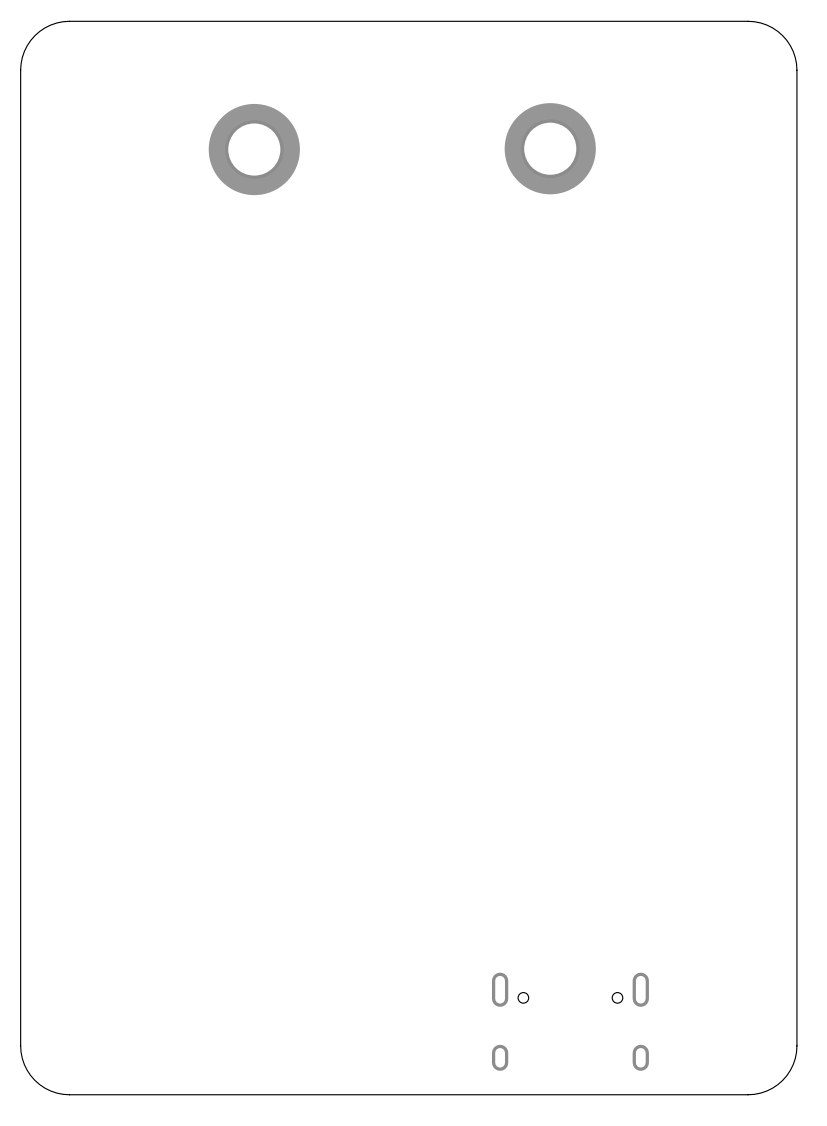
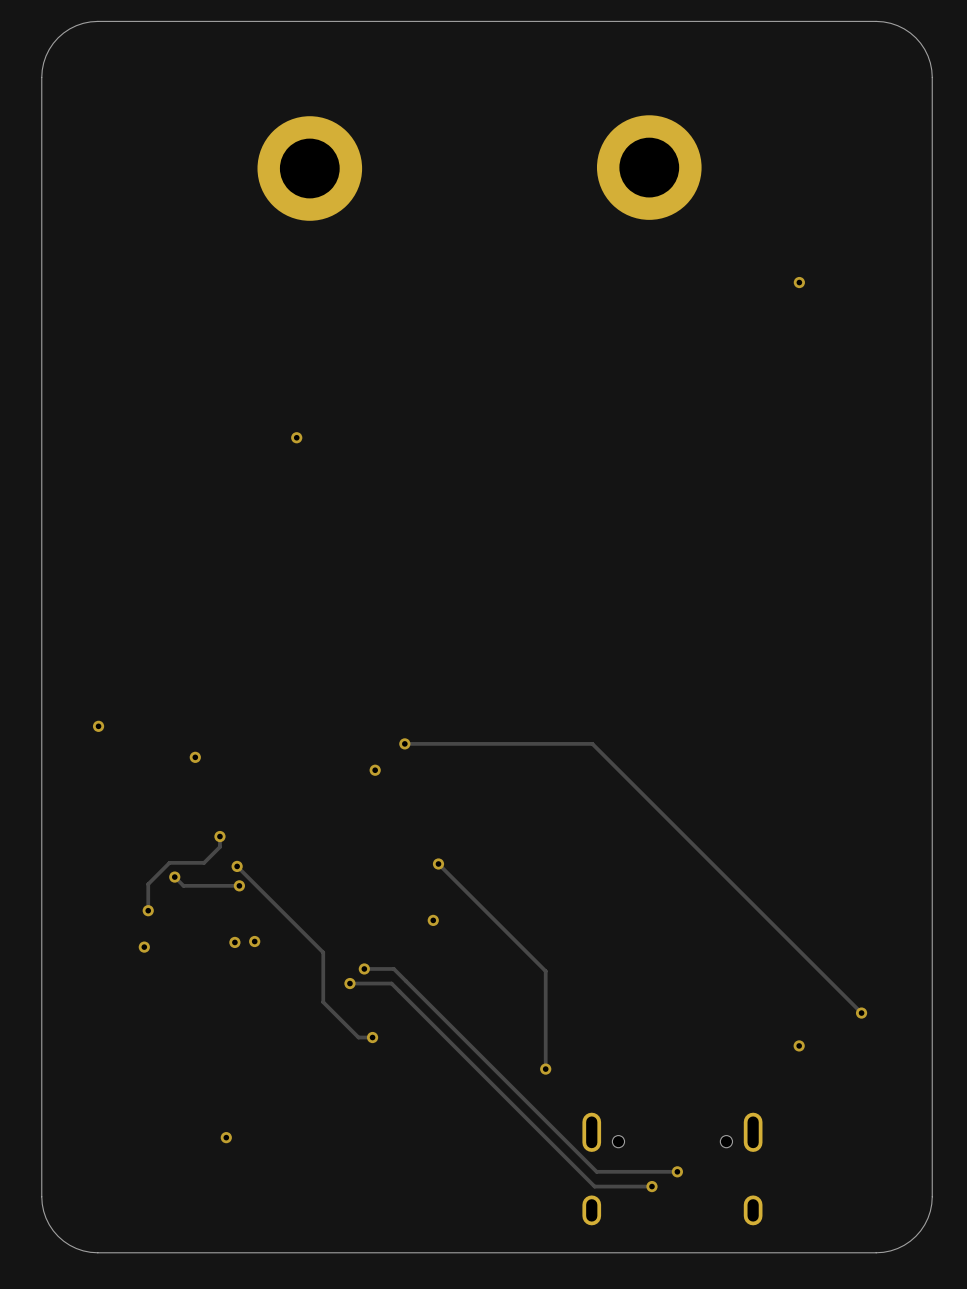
via: none -> (799, 282)
via: none -> (296, 437)
via: none -> (98, 726)
track: none -> (404, 743) (592, 743) (861, 1013)
via: none -> (404, 743)
via: none -> (195, 757)
via: none -> (375, 770)
track: none -> (219, 836) (219, 847) (204, 862) (169, 862) (148, 884) (148, 910)
via: none -> (219, 836)
track: none -> (438, 863) (545, 971) (545, 1069)
via: none -> (438, 863)
track: none -> (237, 866) (323, 952) (323, 1002) (358, 1037) (372, 1037)
via: none -> (237, 866)
track: none -> (174, 877) (183, 885) (239, 885)
via: none -> (174, 877)
via: none -> (239, 885)
via: none -> (148, 910)
via: none -> (433, 920)
via: none -> (254, 941)
via: none -> (234, 942)
via: none -> (144, 947)
track: none -> (364, 968) (393, 968) (596, 1171) (677, 1171)
via: none -> (364, 968)
track: none -> (349, 983) (391, 983) (594, 1186) (651, 1186)
via: none -> (349, 983)
via: none -> (861, 1013)
via: none -> (372, 1037)
via: none -> (799, 1045)
via: none -> (545, 1069)
via: none -> (226, 1137)
via: none -> (677, 1171)
via: none -> (651, 1186)

